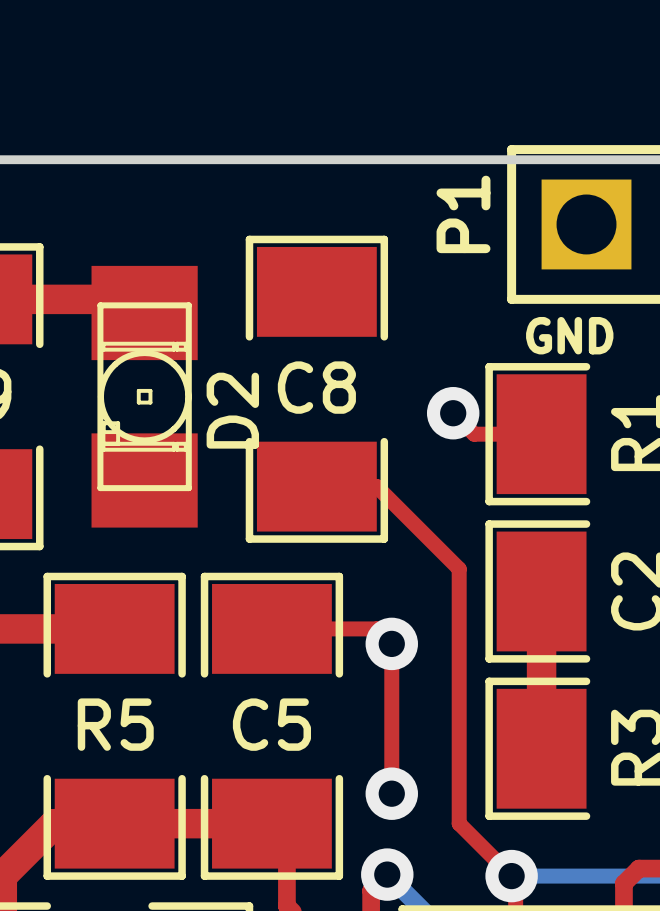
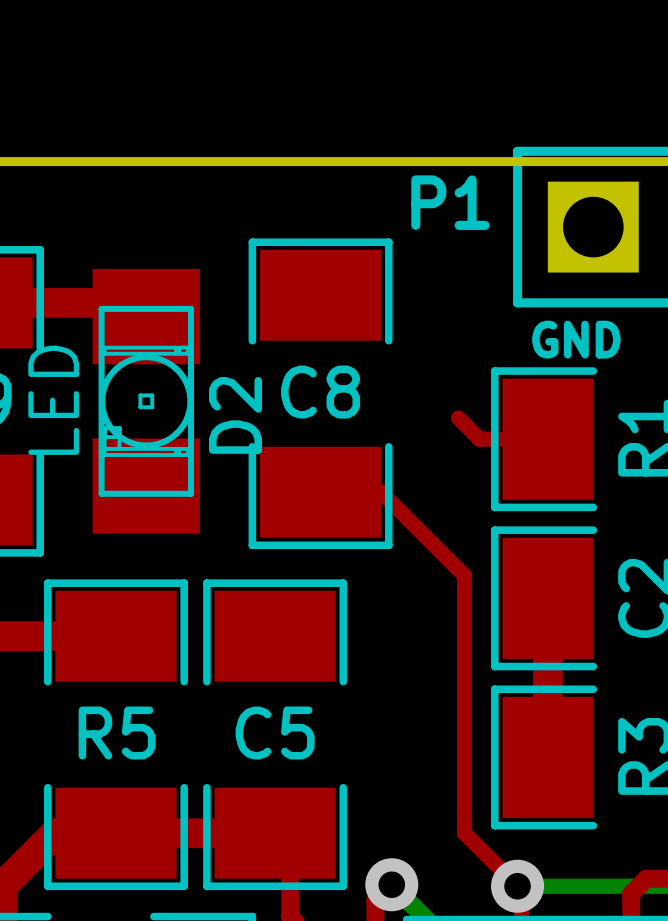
P1 name rotation: 0° (463, 214) -> 90° clockwise (450, 202)
D2 value: none -> LED (53, 400)
via: (453, 413) -> none
top track: (271, 628) (376, 628) (391, 643) (391, 793) -> none
via: (391, 643) -> none
via: (391, 793) -> none

